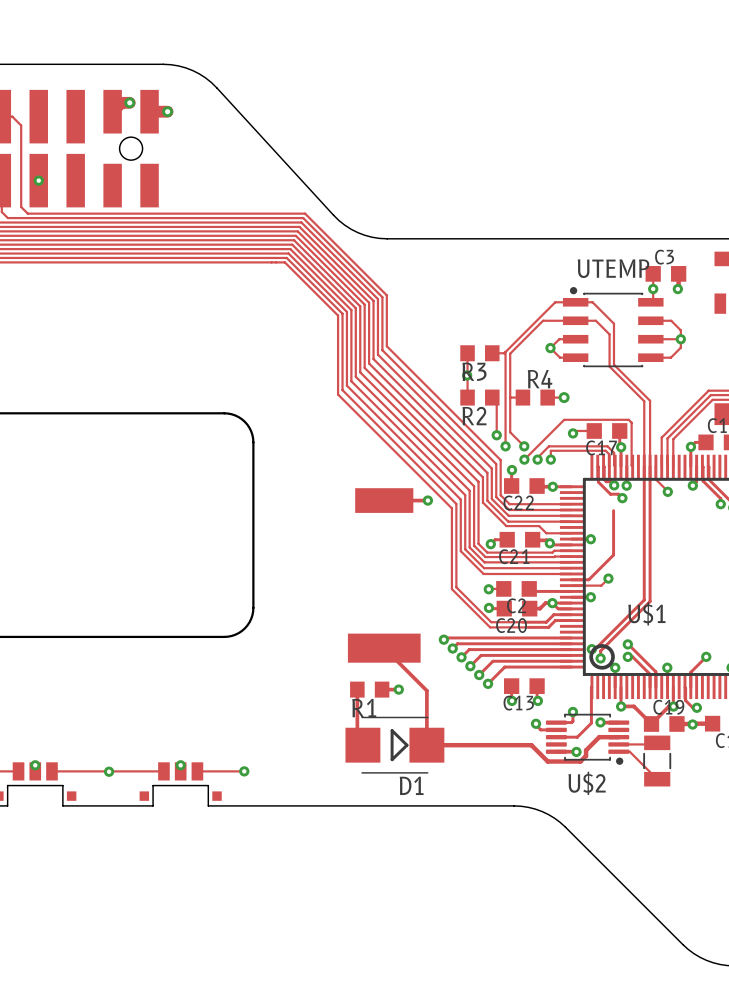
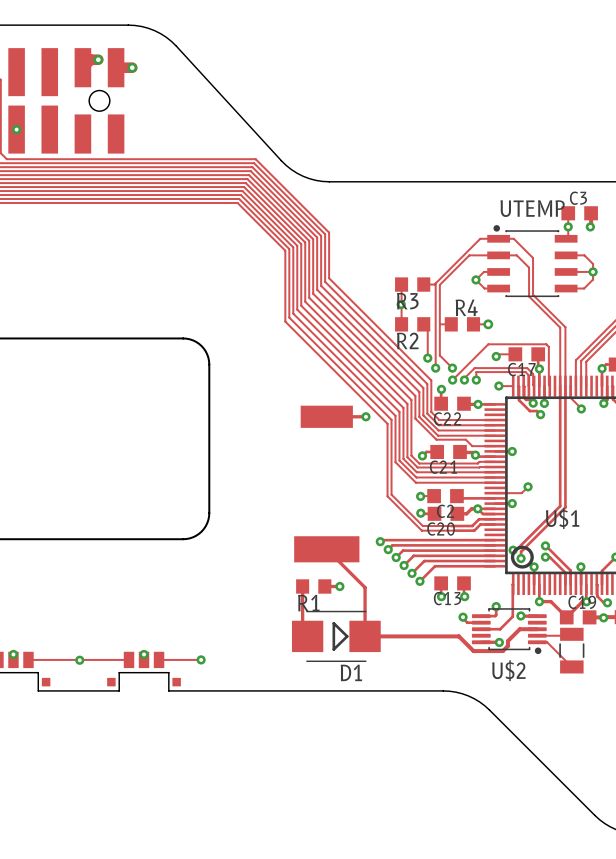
via: none -> (498, 386)
track: none -> (498, 386) (513, 386)
track: (613, 510) (613, 555) (588, 579) (571, 579) -> none

